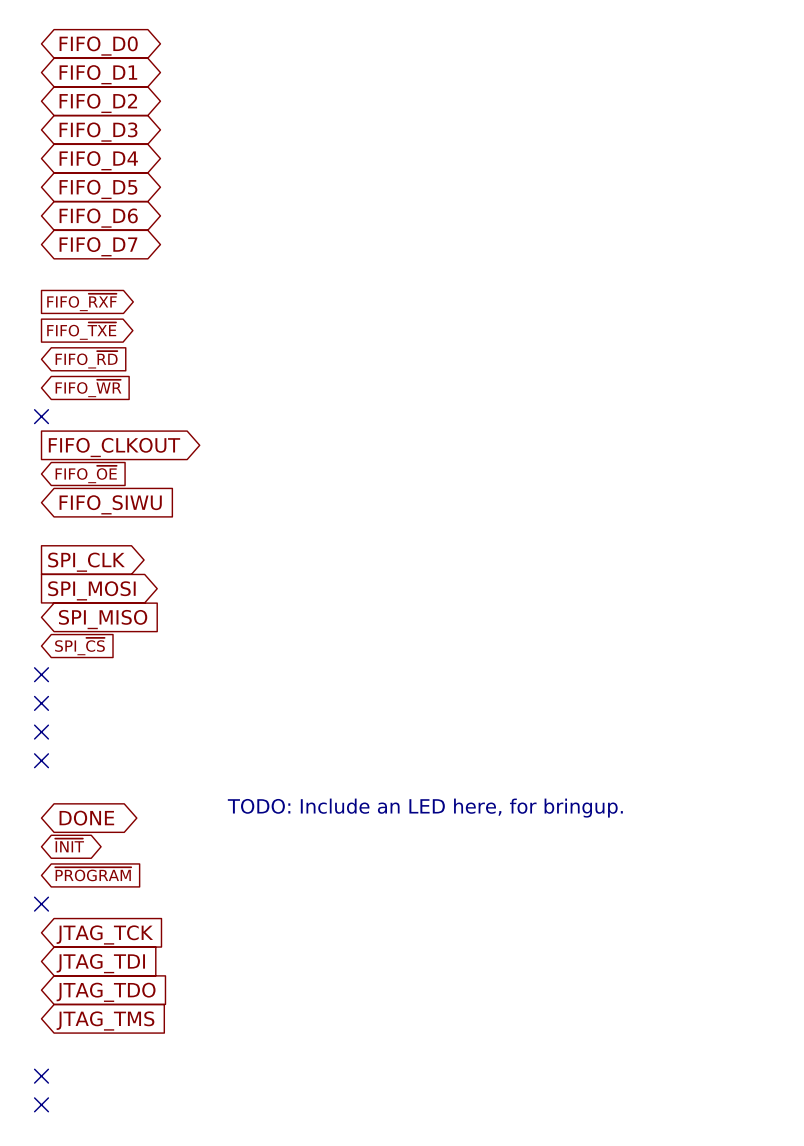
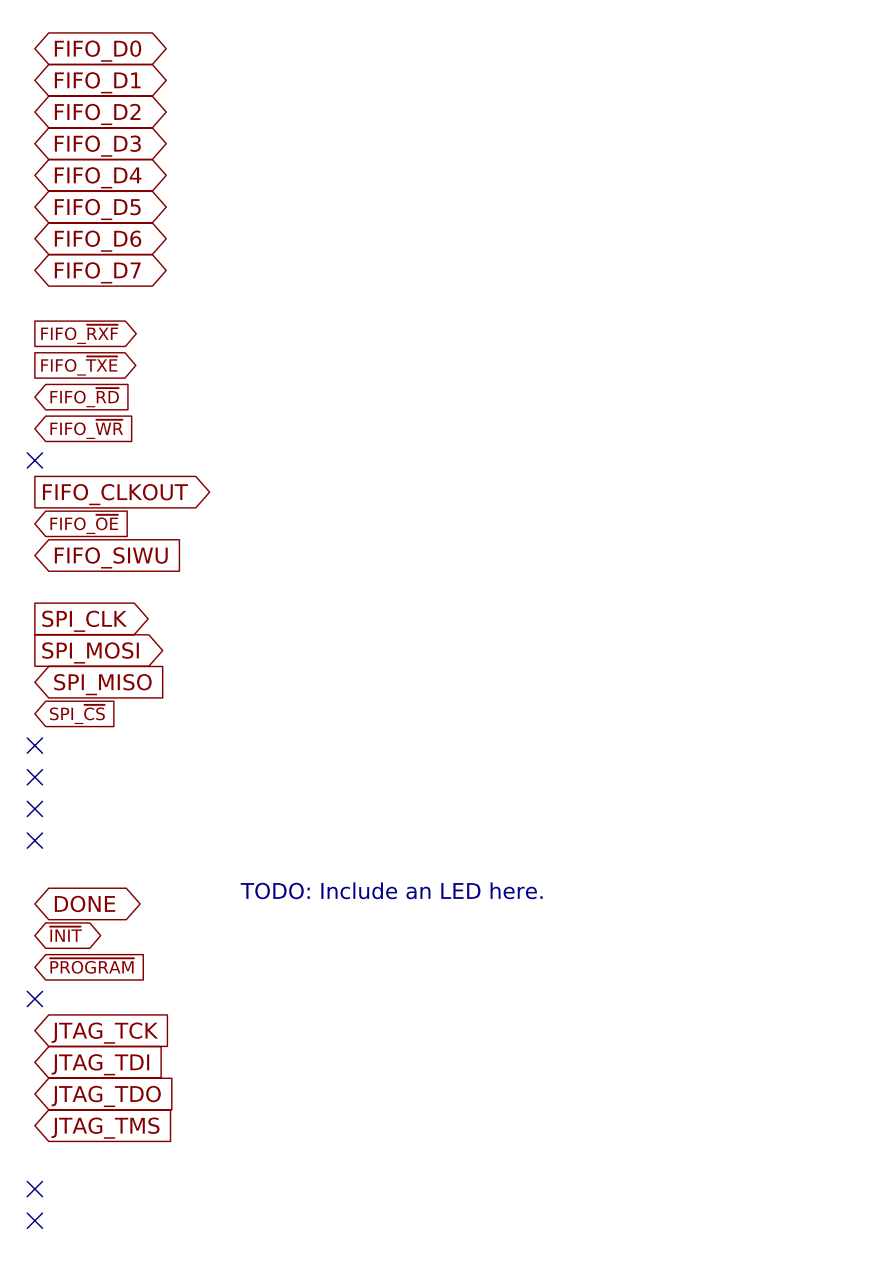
text: TODO: Include an LED here, for bringup. (425, 808) -> TODO: Include an LED here. (391, 890)

